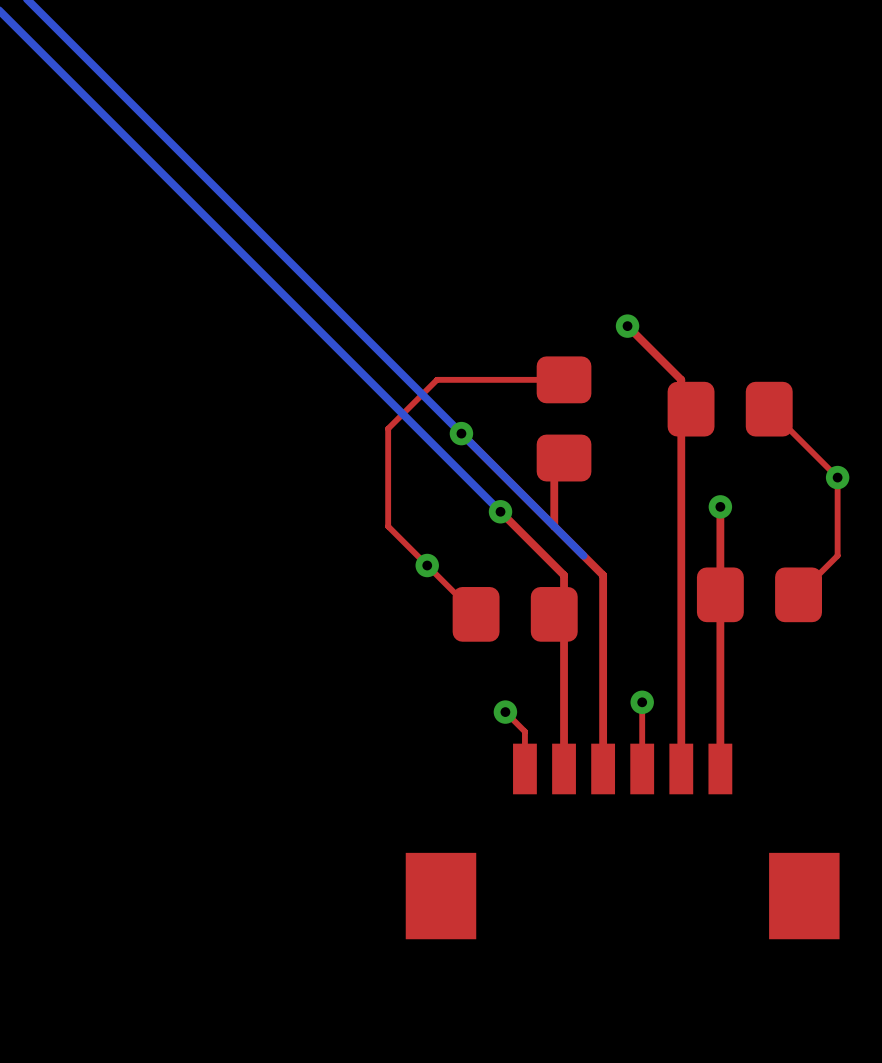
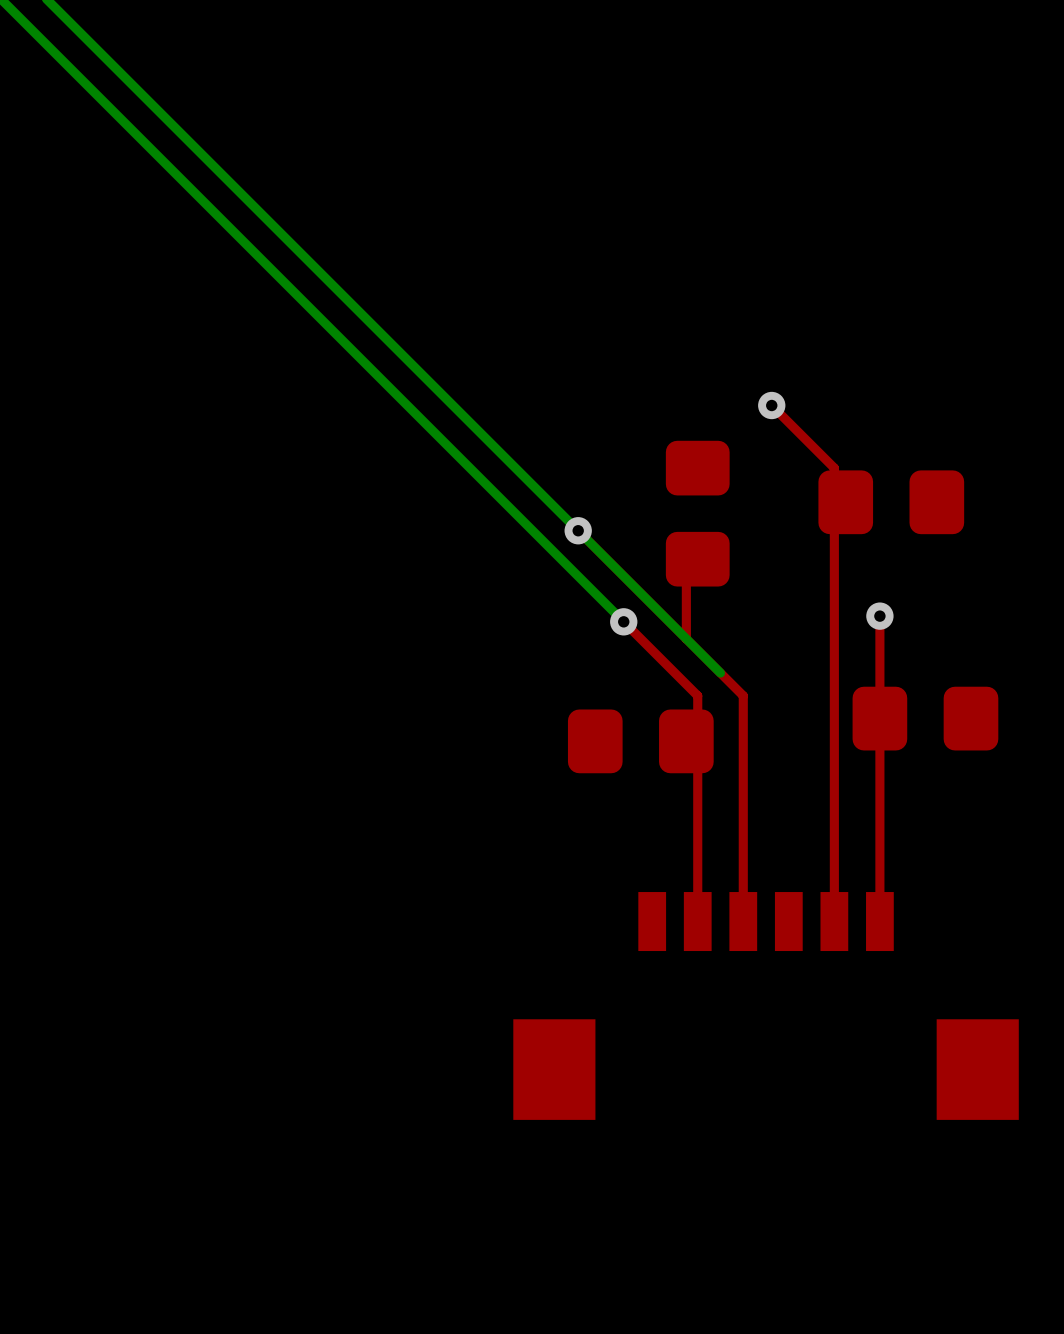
top track: (564, 379) (437, 379) (388, 428) (388, 526) (476, 614) -> none
top track: (769, 409) (837, 477) (837, 555) (798, 594) -> none
via: (837, 477) -> none
via: (427, 565) -> none
top track: (642, 702) (642, 768) -> none
via: (642, 702) -> none
top track: (505, 712) (524, 731) (524, 768) -> none
via: (505, 712) -> none

